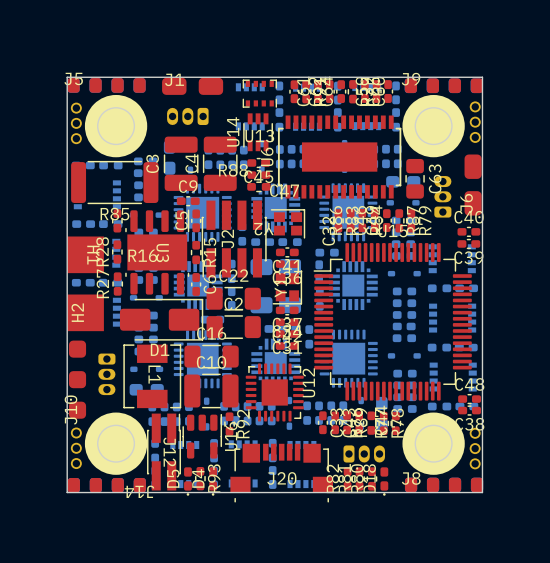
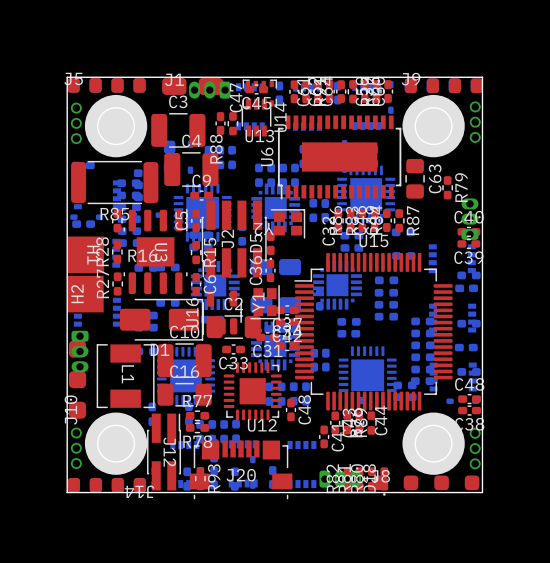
part footprint: [392, 81, 400, 105] -> [388, 80, 394, 114]
part position: (187, 116) -> (209, 90)
part: (279, 119) -> none
part: (337, 119) -> none
part: (396, 119) -> none
U14 rotation: 0° (258, 132) -> 180° (256, 117)
part: (261, 156) -> none
part: (279, 156) -> none
part: (291, 156) -> none
part: (385, 156) -> none
part: (397, 156) -> none
part: (243, 157) -> none
part: (145, 161) -> none
C45 position: (258, 162) -> (256, 89)
C3 rotation: 0° (181, 163) -> 90° clockwise (178, 130)
C3 position: (181, 163) -> (178, 130)
C4 rotation: 0° (220, 163) -> 90° clockwise (191, 169)
part: (110, 165) -> none
R88 name position: R88 (233, 170) -> R88 (216, 149)
C47 rotation: 0° (258, 175) -> 90° clockwise (220, 123)
C47 position: (258, 175) -> (220, 123)
part: none -> (258, 175)
part: none -> (271, 175)
part: none -> (283, 175)
part: none -> (295, 175)
part: (403, 181) -> none
part: none -> (128, 183)
J6: (473, 185) -> none
R88 rotation: 0° (258, 186) -> 90° clockwise (232, 123)
R88 position: (258, 186) -> (232, 123)
C47 name position: C47 (284, 190) -> C47 (236, 97)
part: none -> (128, 195)
part position: (442, 196) -> (469, 219)
C9 position: (188, 201) -> (201, 195)
part: (403, 202) -> none
part: none -> (129, 207)
U3 footprint: [125, 209, 190, 295] -> [123, 209, 188, 295]
part: none -> (313, 210)
part: none -> (325, 210)
part position: (348, 212) -> (366, 194)
part: none -> (86, 217)
part: none -> (129, 219)
part: (403, 220) -> none
R79 position: (411, 220) -> (447, 187)
part: (110, 224) -> none
part: none -> (129, 231)
part: (146, 232) -> none
part: none -> (200, 235)
part: none -> (351, 235)
part: (262, 242) -> none
part: (290, 242) -> none
part: none -> (129, 243)
part: (403, 244) -> none
part: none -> (200, 247)
part: none -> (351, 247)
C41 rotation: 0° (287, 252) -> 90° clockwise (324, 436)
C41 position: (287, 252) -> (324, 436)
part: (327, 252) -> none
C36 rotation: 0° (287, 264) -> 90° clockwise (270, 270)
C36 position: (287, 264) -> (270, 270)
part: none -> (168, 267)
part: (231, 271) -> none
part: (319, 271) -> none
part: (404, 273) -> none
part: none -> (468, 275)
part: (146, 280) -> none
part: none -> (386, 280)
part: (110, 282) -> none
part position: (198, 285) -> (215, 285)
part position: (353, 285) -> (337, 285)
Y1 position: (287, 287) -> (265, 302)
part: (439, 288) -> none
part: (404, 291) -> none
part: none -> (386, 292)
part: (146, 297) -> none
part: (231, 298) -> none
C22: (233, 298) -> none
part: none -> (167, 302)
part: (404, 303) -> none
part: none -> (386, 304)
H2 position: (85, 312) -> (85, 294)
part: (404, 315) -> none
part: none -> (386, 316)
part: none -> (349, 321)
U15 position: (392, 321) -> (373, 331)
part: none -> (422, 321)
part: none -> (469, 323)
part: (404, 326) -> none
C31 position: (287, 333) -> (267, 337)
part: none -> (348, 333)
part: none -> (422, 333)
part: (309, 336) -> none
part: (404, 338) -> none
part: (146, 339) -> none
part: none -> (422, 345)
part: (439, 347) -> none
part: (404, 355) -> none
C16 position: (211, 356) -> (184, 394)
part: none -> (422, 357)
part position: (348, 358) -> (367, 375)
part position: (202, 359) -> (185, 375)
part: none -> (314, 360)
part: none -> (325, 360)
part position: (275, 363) -> (275, 345)
part: (146, 369) -> none
part: none -> (422, 369)
part: none -> (469, 371)
part: (404, 373) -> none
part position: (106, 374) -> (80, 351)
L1 position: (152, 376) -> (125, 376)
part: none -> (422, 381)
part: (146, 389) -> none
C10 position: (211, 391) -> (184, 360)
U12 rotation: 0° (274, 392) -> 90° clockwise (252, 391)
part: none -> (293, 393)
part: none -> (305, 393)
part: none -> (269, 394)
part: none -> (281, 394)
part footprint: [455, 402, 479, 411] -> [446, 398, 480, 405]
part: (439, 406) -> none
C48: none -> (290, 409)
part: (404, 409) -> none
part: (224, 413) -> none
part: (235, 413) -> none
part: (247, 413) -> none
part: (259, 413) -> none
part: (271, 413) -> none
part: (289, 413) -> none
part: (307, 413) -> none
part: (319, 413) -> none
part: (331, 413) -> none
part: (343, 413) -> none
part: (381, 413) -> none
part: (164, 414) -> none
part: (176, 414) -> none
part: (206, 414) -> none
C33 rotation: 0° (322, 422) -> 90° clockwise (233, 349)
C33 position: (322, 422) -> (233, 349)
R78 rotation: 0° (383, 423) -> 90° clockwise (197, 427)
R78 position: (383, 423) -> (197, 427)
R77 rotation: 0° (395, 423) -> 90° clockwise (197, 415)
R77 position: (395, 423) -> (197, 415)
R92: (229, 424) -> none
part: none -> (200, 431)
part: none -> (212, 431)
part: none -> (224, 431)
part: none -> (236, 431)
U16 rotation: 0° (202, 436) -> 180° (222, 312)
U16 position: (202, 436) -> (222, 312)
part: (155, 450) -> none
part: (272, 450) -> none
part position: (364, 453) -> (340, 479)
part: none -> (252, 472)
J20 position: (281, 473) -> (241, 469)
J8 footprint: [404, 477, 484, 493] -> [373, 475, 480, 491]
part: none -> (187, 479)
part: none -> (234, 479)
D5 position: (187, 481) -> (270, 245)
D4: (213, 481) -> none

